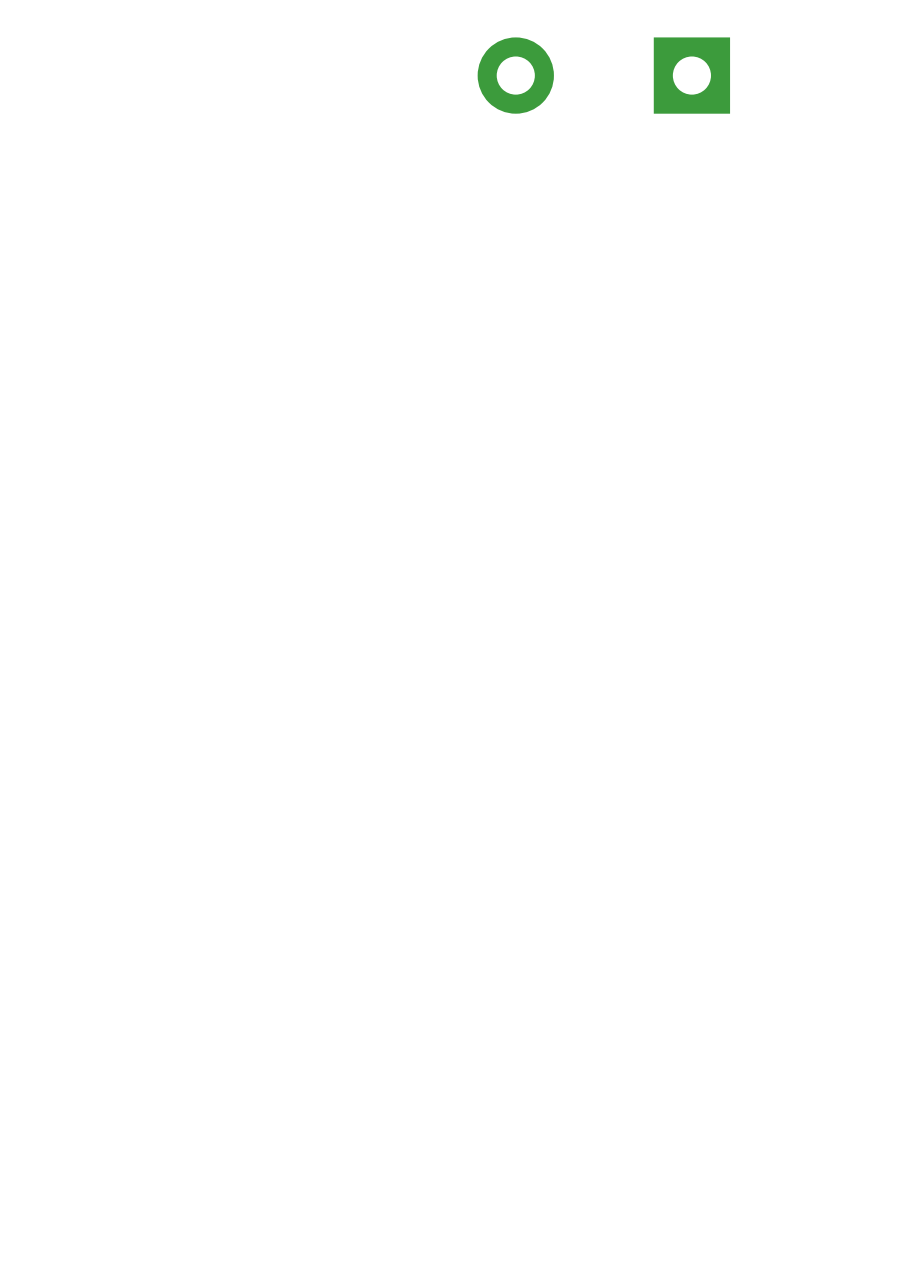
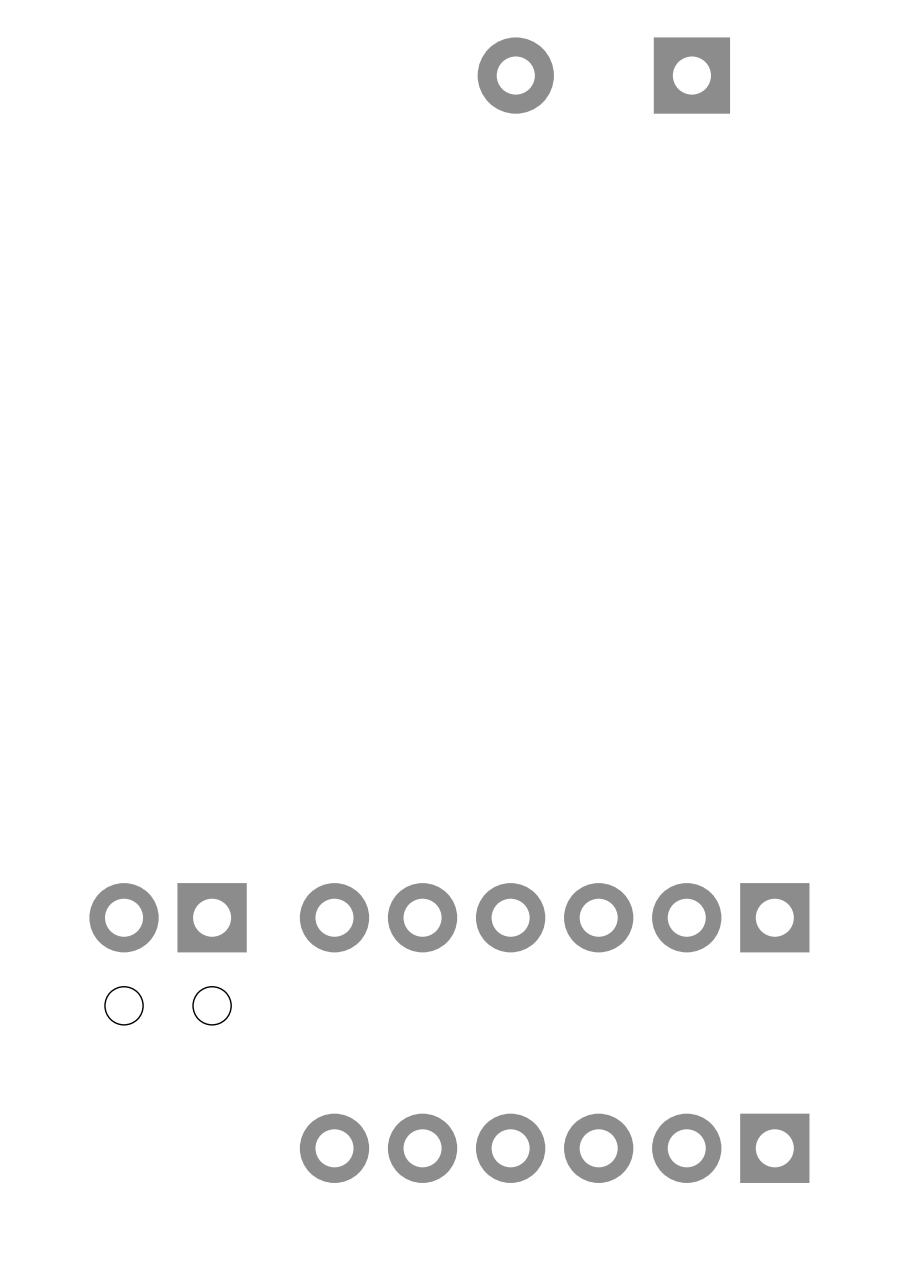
part: none -> (554, 917)
part: none -> (168, 953)
part: none -> (554, 1148)

